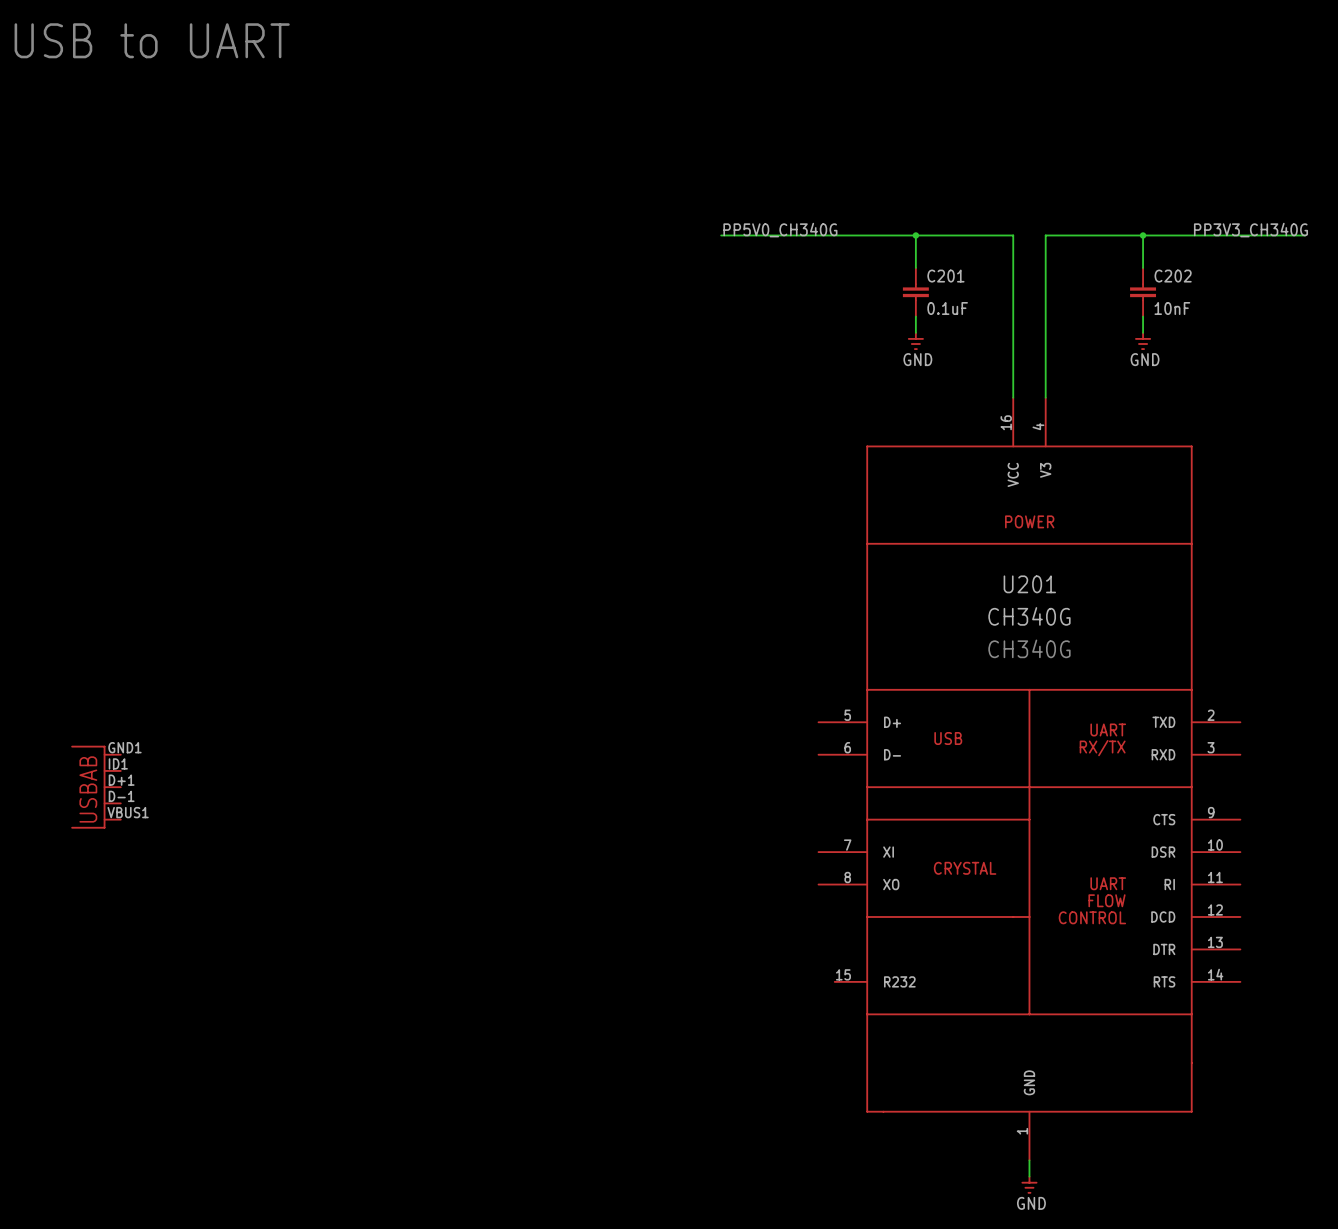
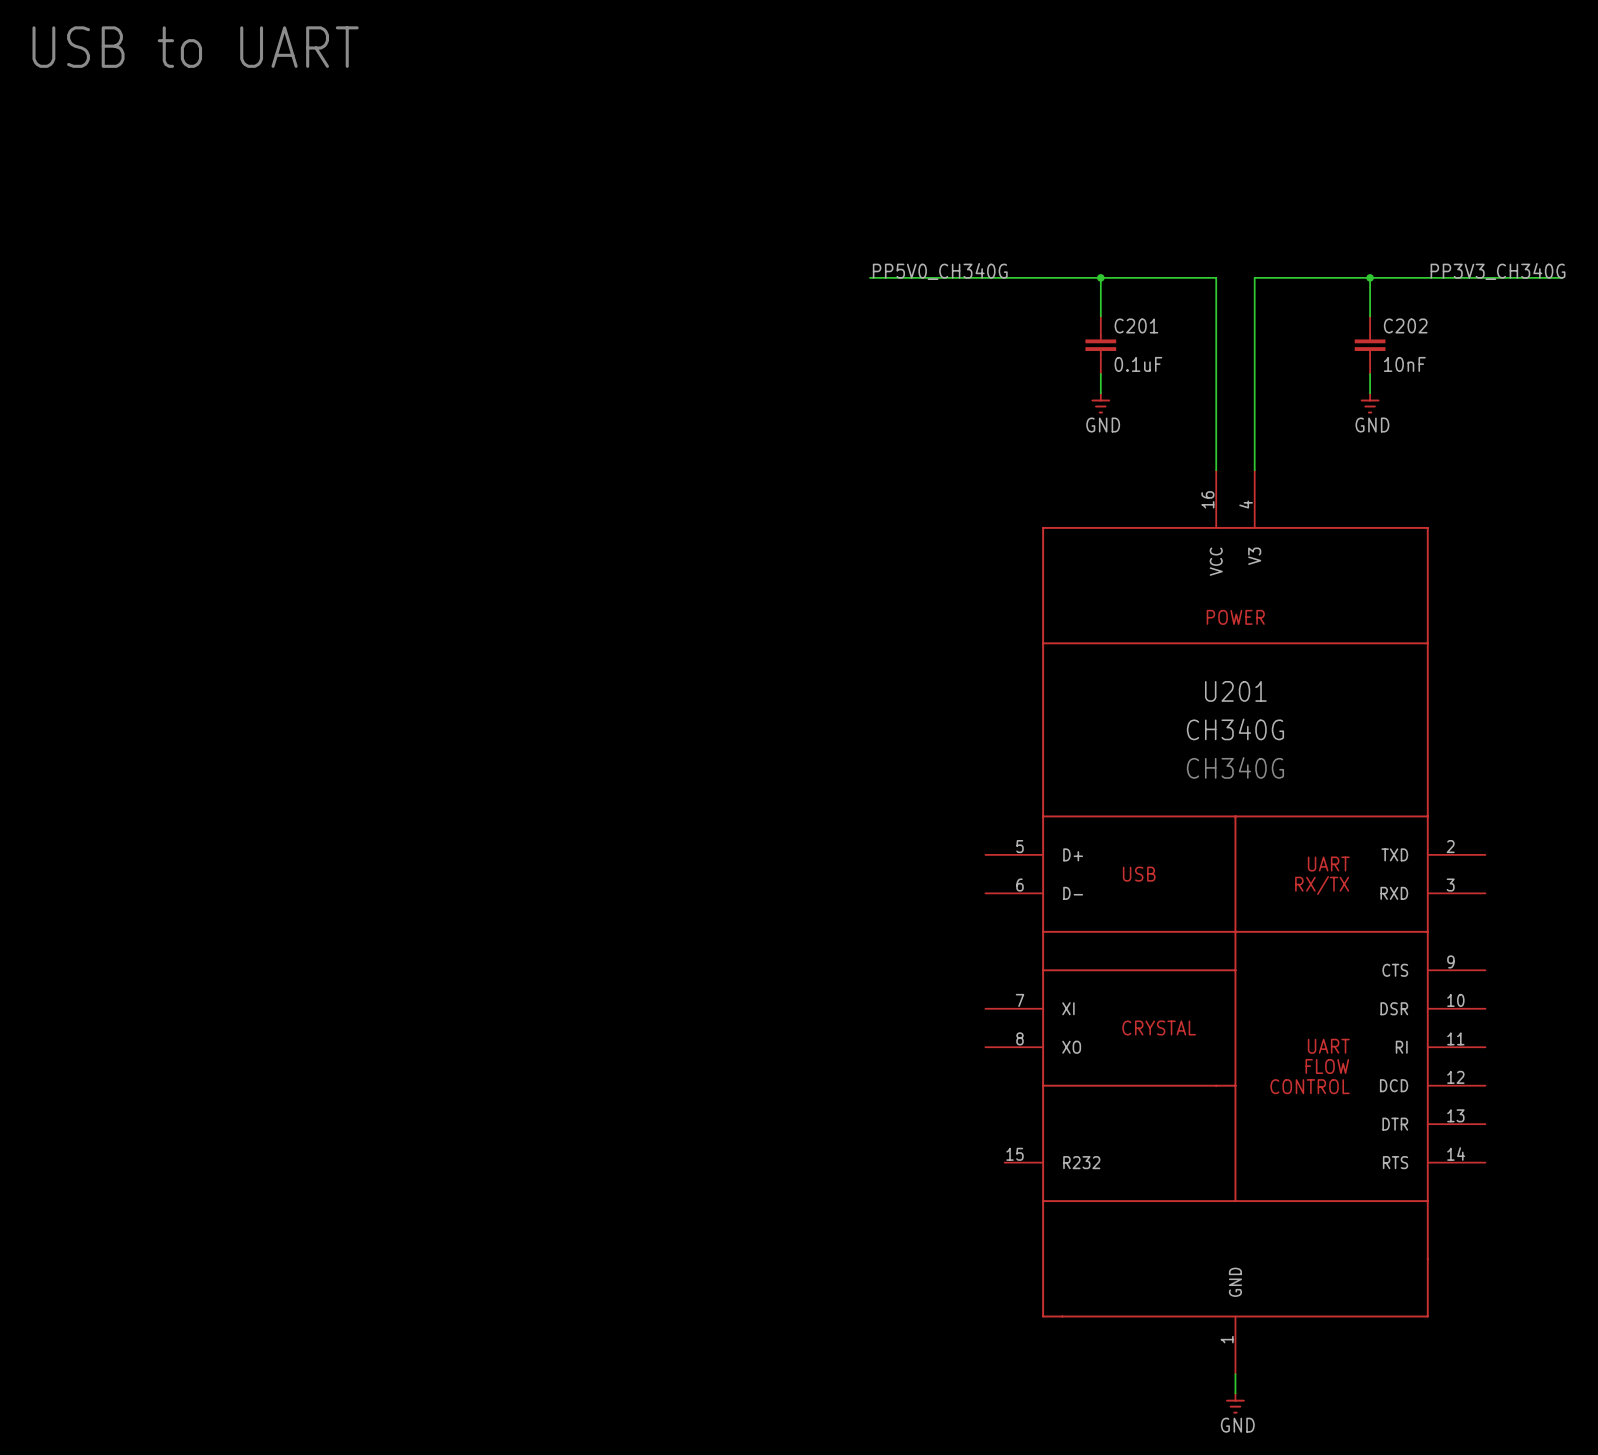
part: (96, 787) -> none

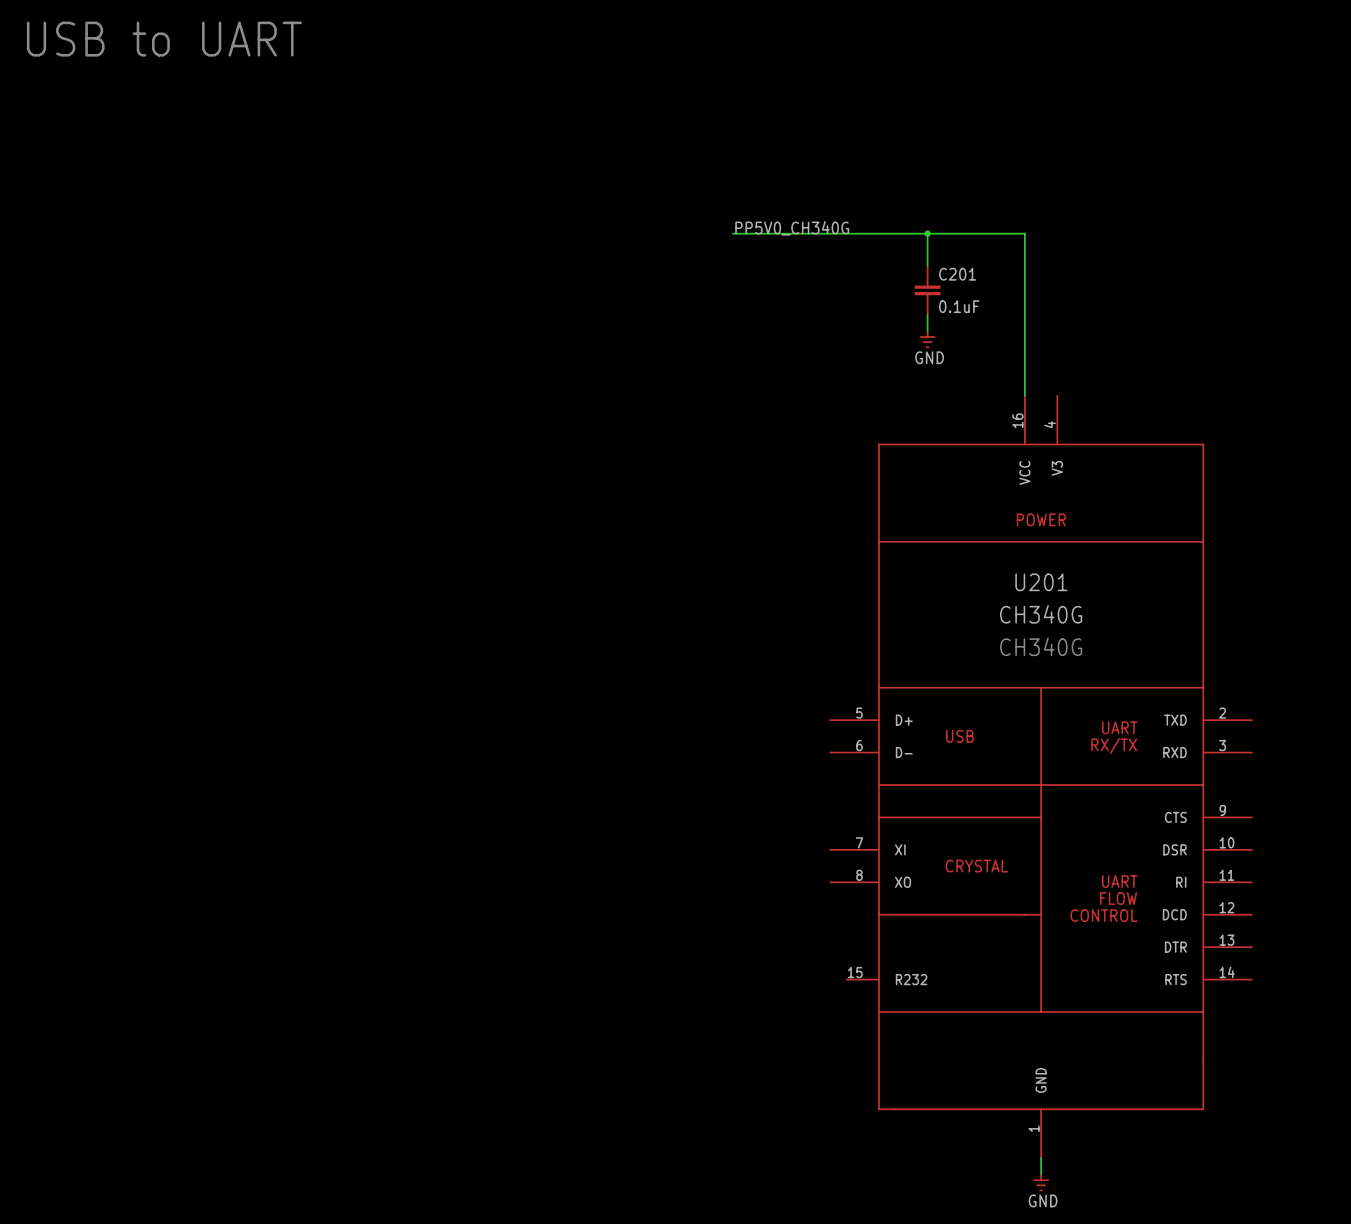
label: PP3V3_CH340G (1498, 271) -> none
wire: (1370, 277) (1370, 316) -> none
junction: (1370, 277) -> none
wire: (1562, 277) (1254, 277) (1254, 470) -> none
C202: 10nF (1370, 345) -> none
wire: (1370, 374) (1370, 393) -> none
power symbol: GND (1370, 403) -> none

